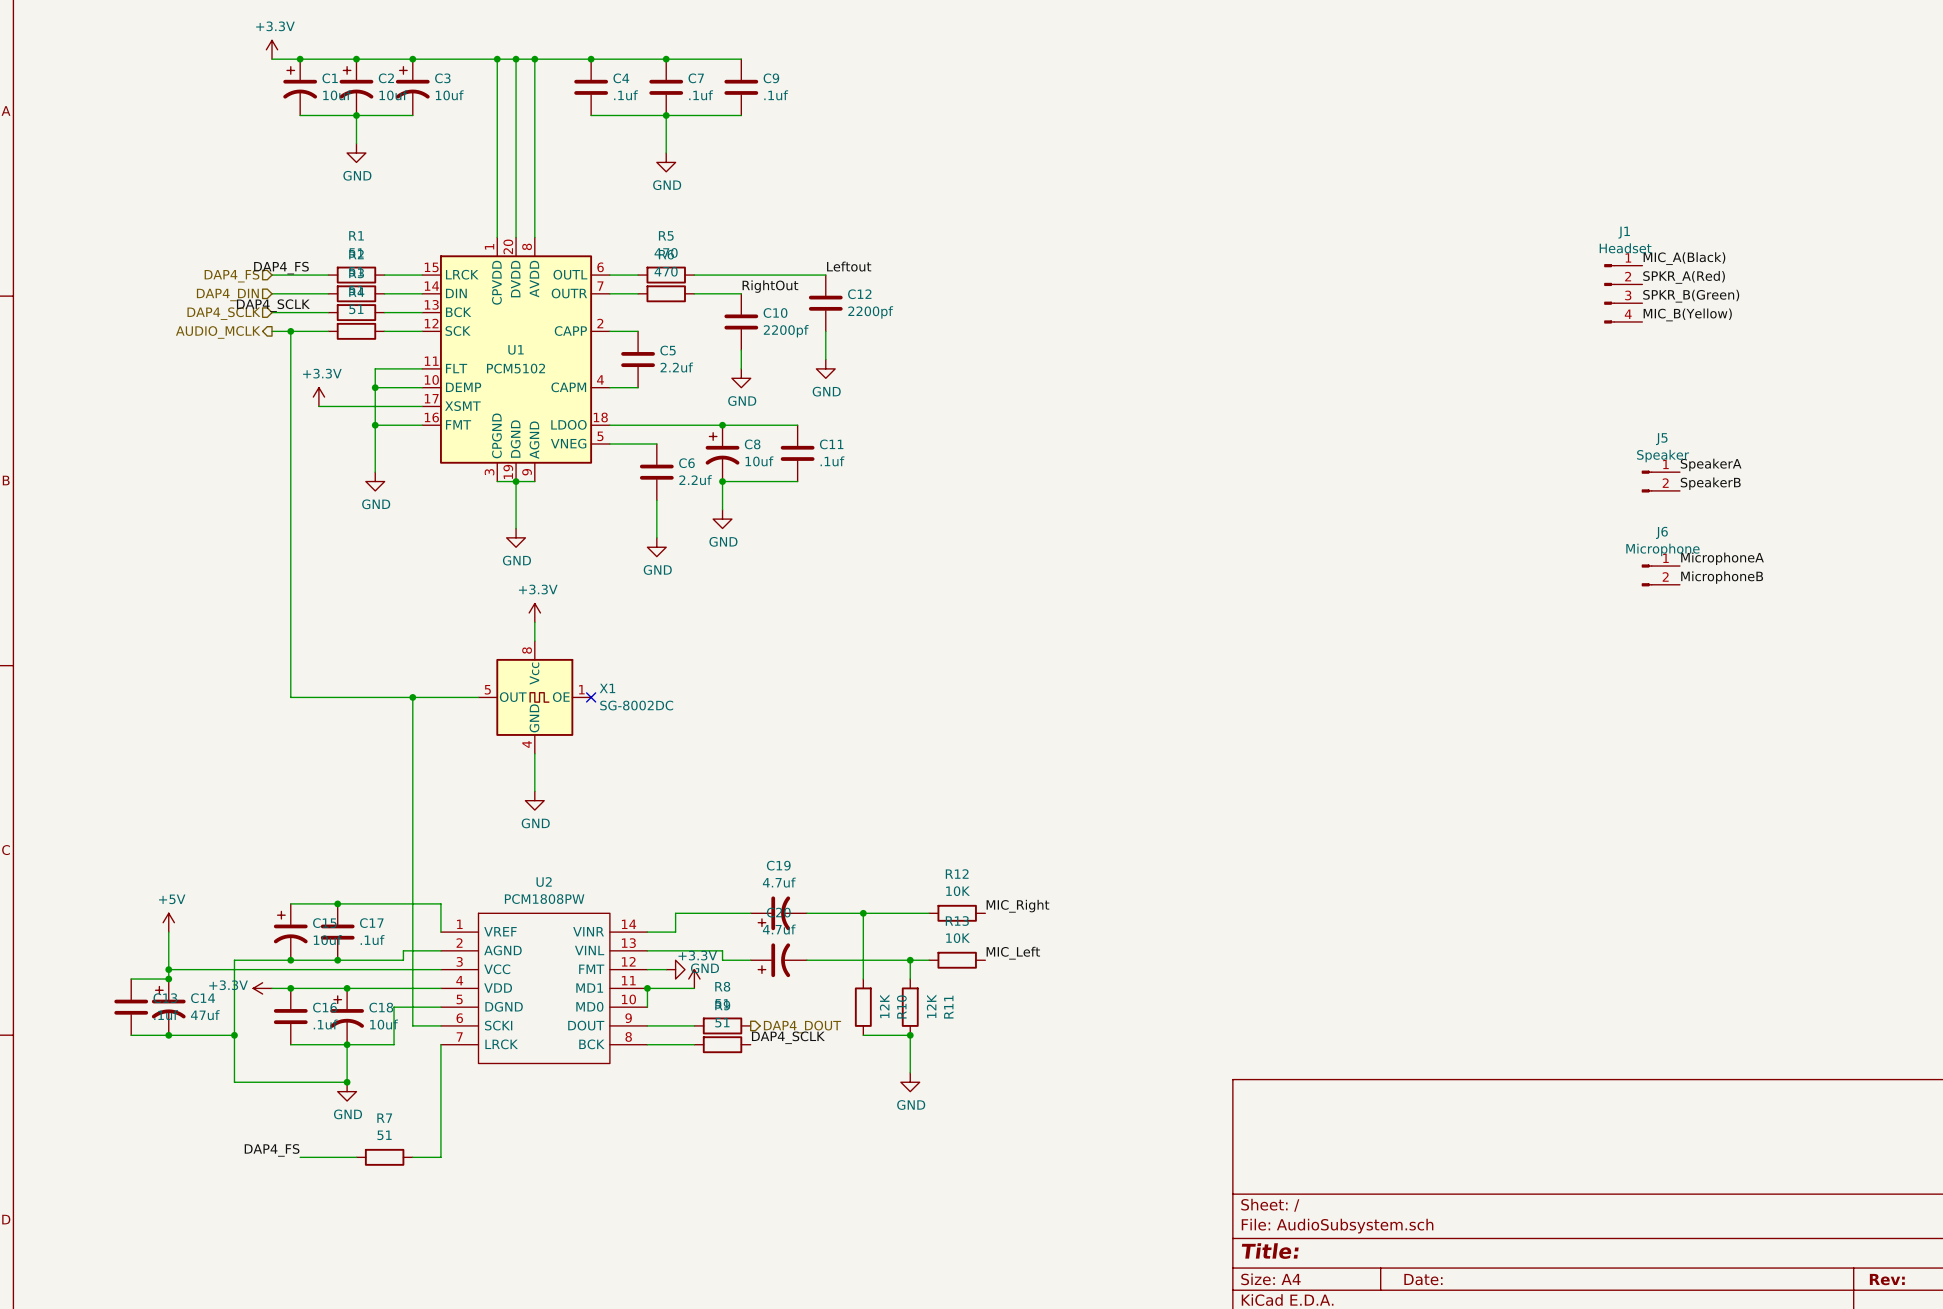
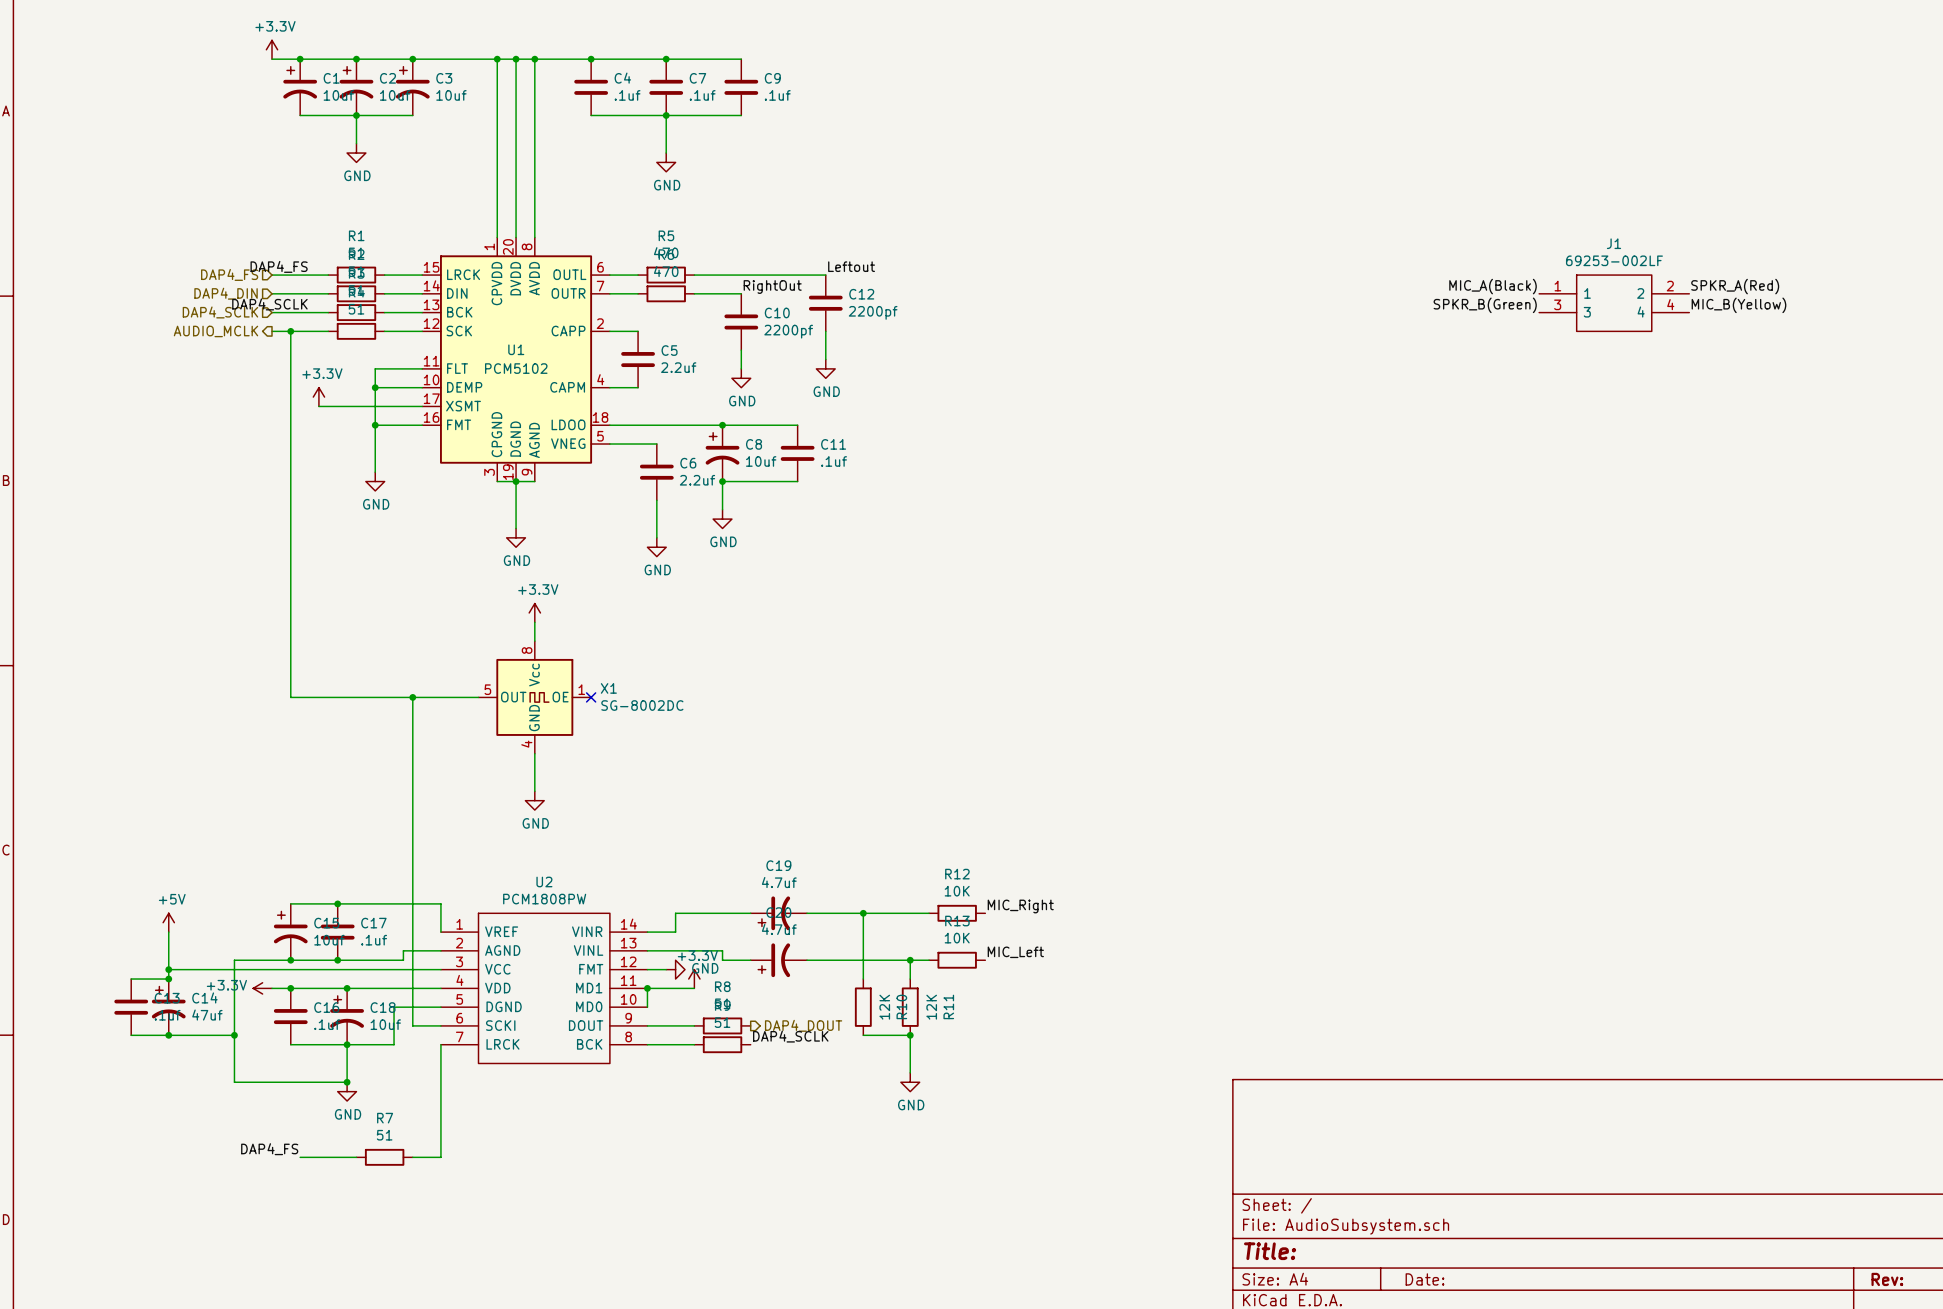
J1 value: Headset (1625, 248) -> 69253-002LF (1614, 260)
label position: MIC_A(Black) (1684, 258) -> MIC_A(Black) (1493, 286)
J1 symbol: [1604, 264, 1643, 324] -> [1539, 274, 1690, 332]
label position: SPKR_A(Red) (1684, 277) -> SPKR_A(Red) (1735, 286)
label position: SPKR_B(Green) (1691, 296) -> SPKR_B(Green) (1485, 305)
label position: MIC_B(Yellow) (1687, 314) -> MIC_B(Yellow) (1738, 305)
label: SpeakerA (1711, 464) -> none
J5: Speaker (1660, 481) -> none
label: SpeakerB (1710, 483) -> none
label: MicrophoneA (1722, 558) -> none
J6: Microphone (1660, 575) -> none
label: MicrophoneB (1722, 577) -> none

